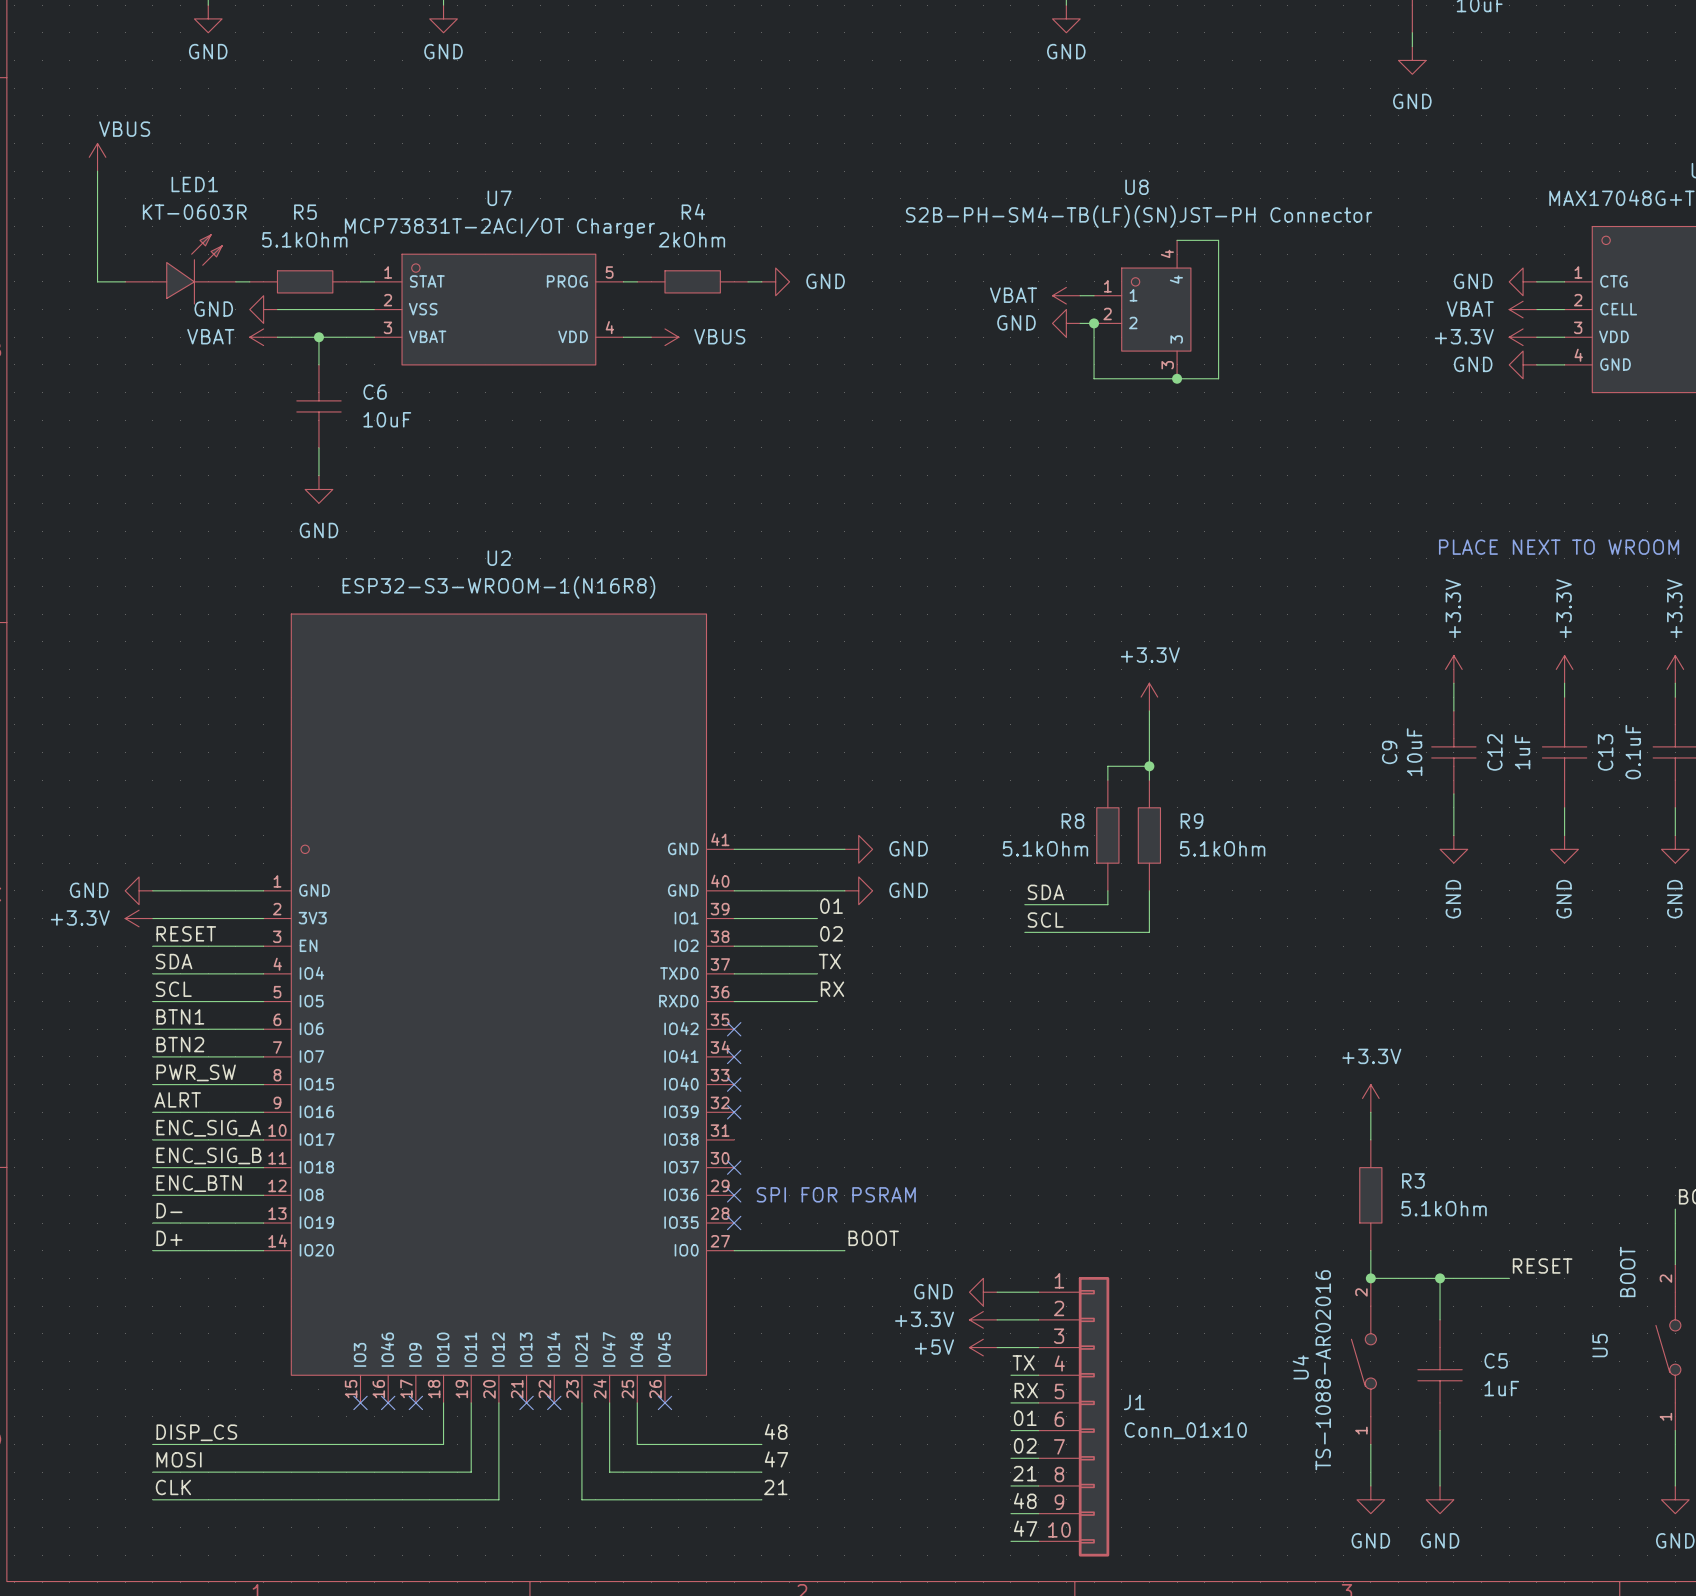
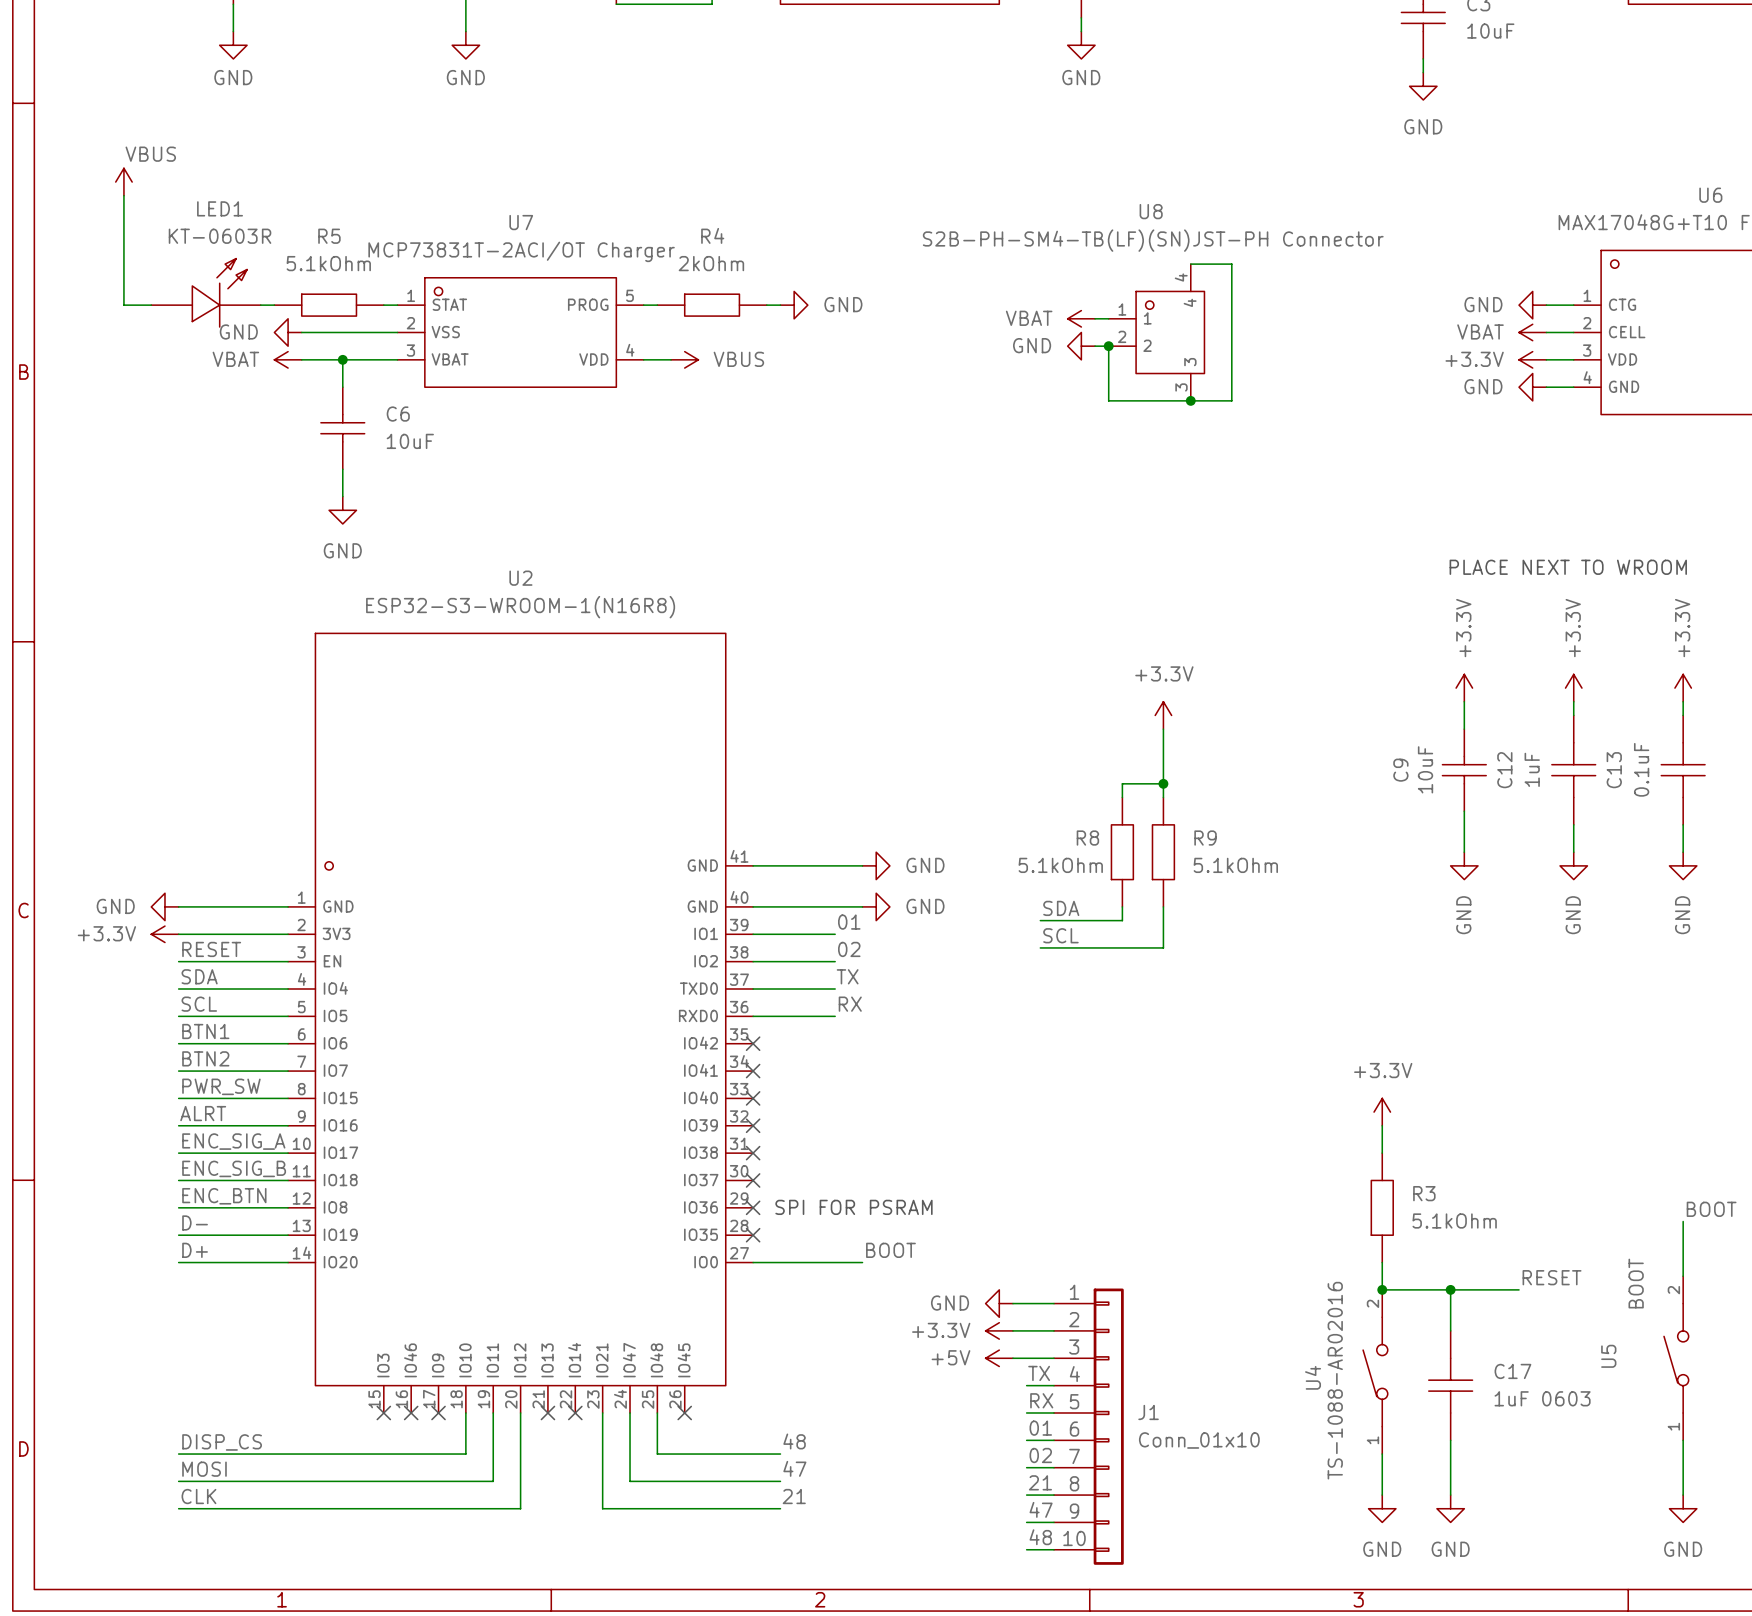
no-connect mark: none -> (753, 1153)
C5 name: C5 (1496, 1360) -> C17 (1512, 1371)
C5 value: 1uF (1501, 1388) -> 1uF 0603 (1542, 1398)
label: 48 (1025, 1500) -> 47 (1041, 1509)
label: 47 (1025, 1528) -> 48 (1040, 1537)

